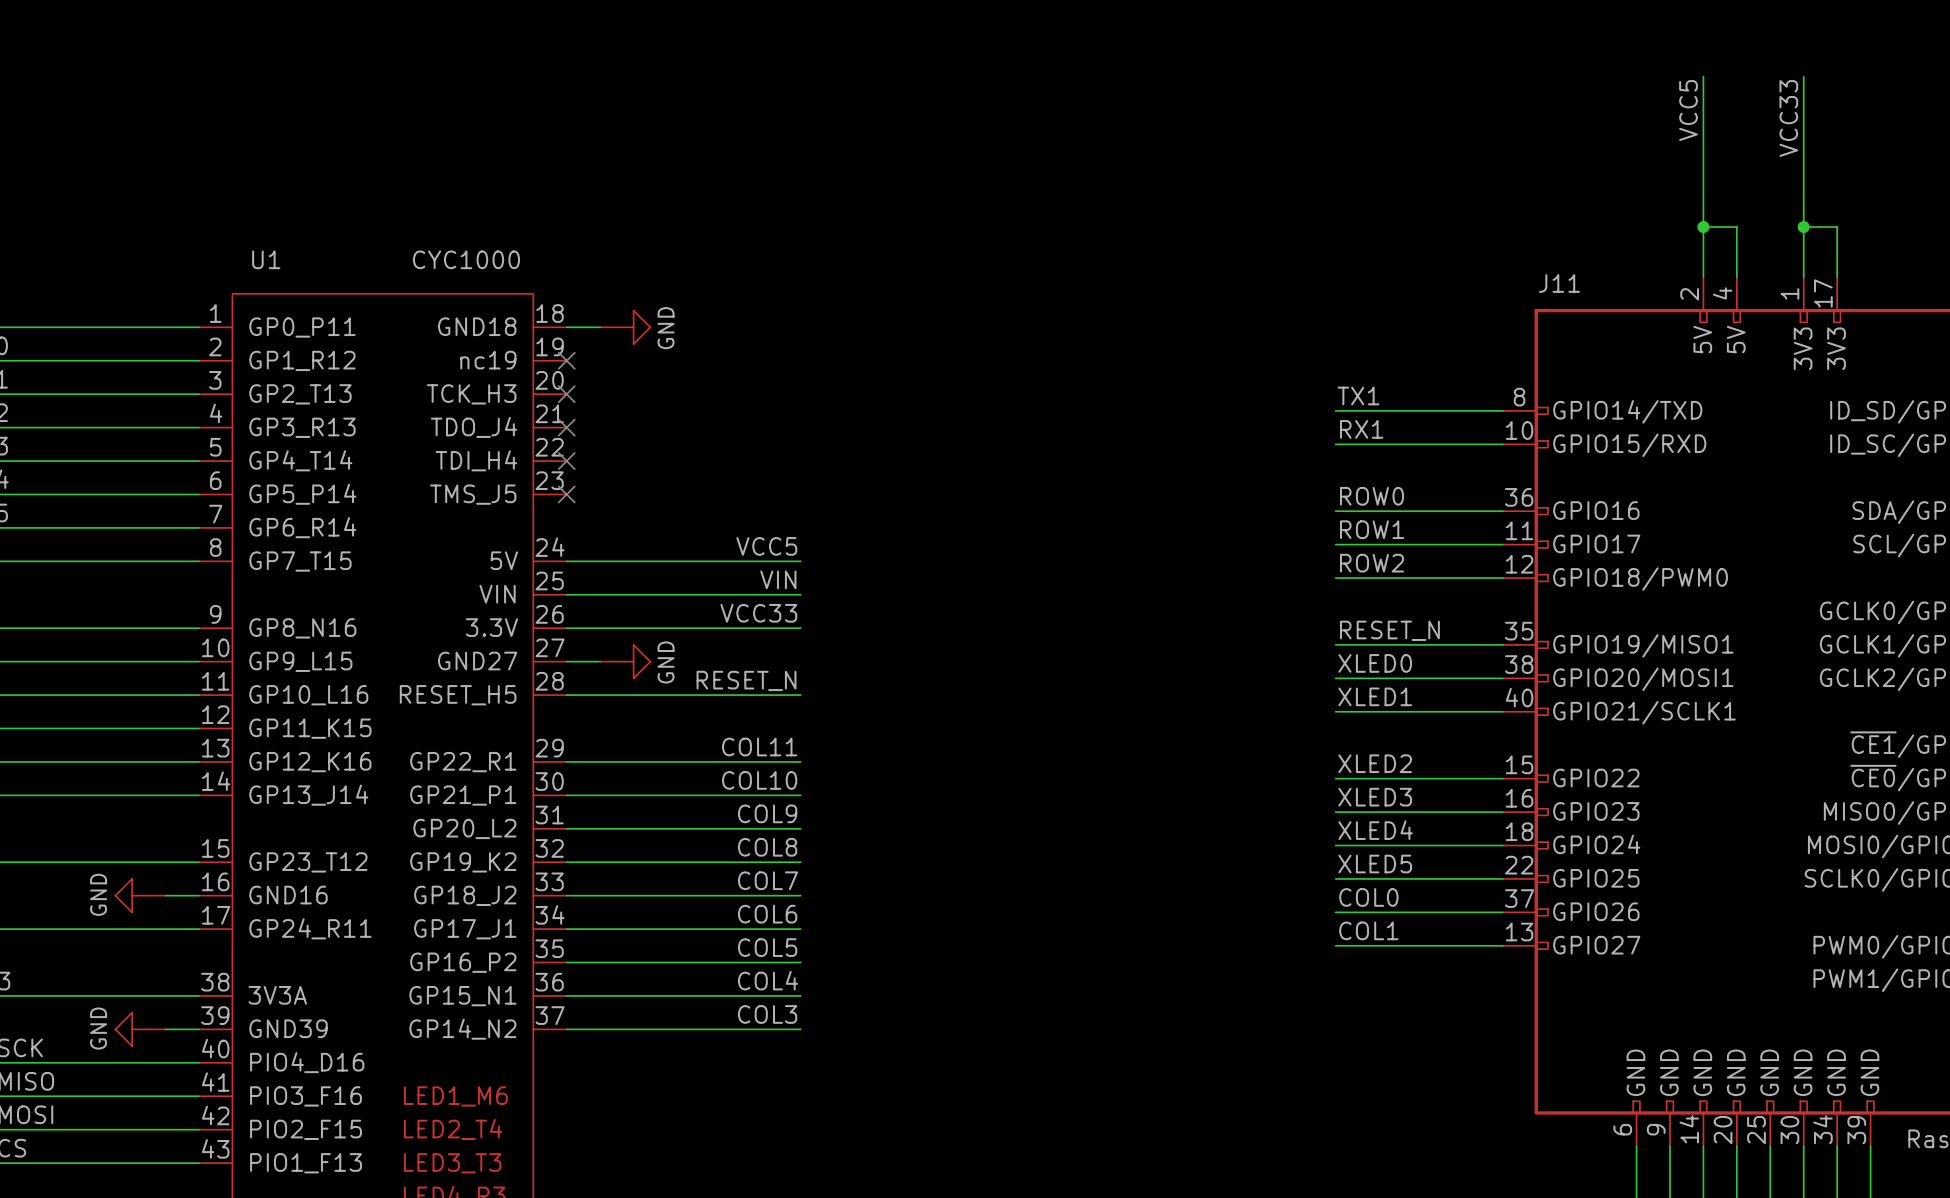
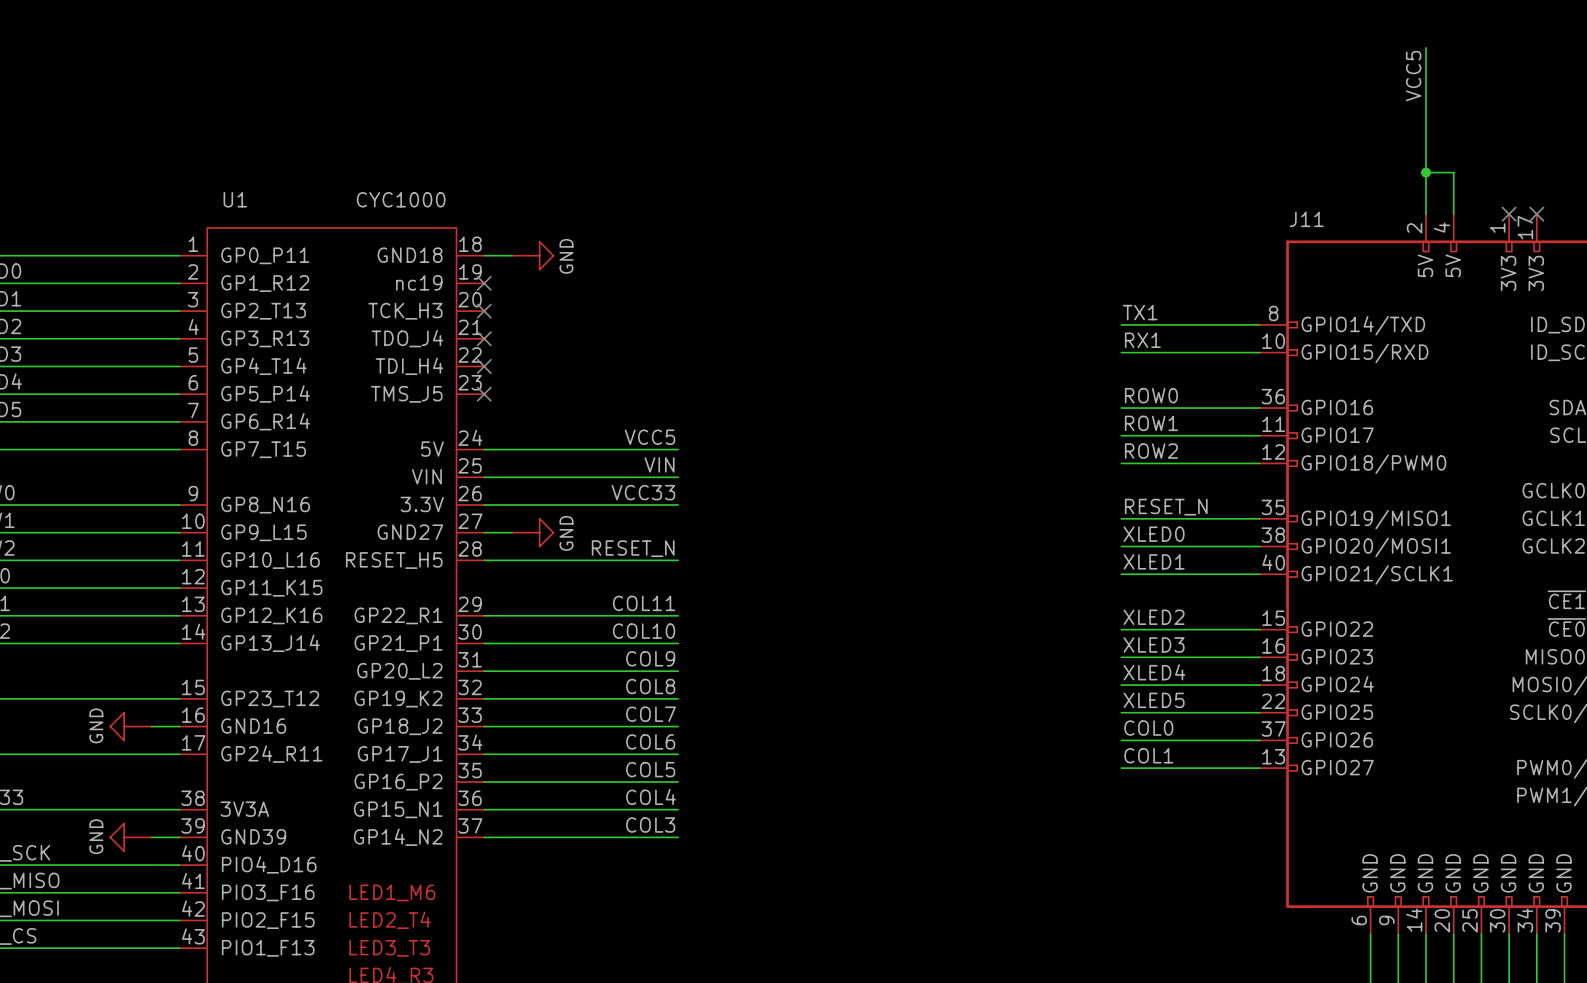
wire: (1803, 76) (1803, 277) -> none
label: VCC33 (1788, 118) -> none
wire: (1803, 227) (1837, 227) (1837, 277) -> none
junction: (1803, 227) -> none
no-connect mark: none -> (1509, 214)
no-connect mark: none -> (1536, 214)

